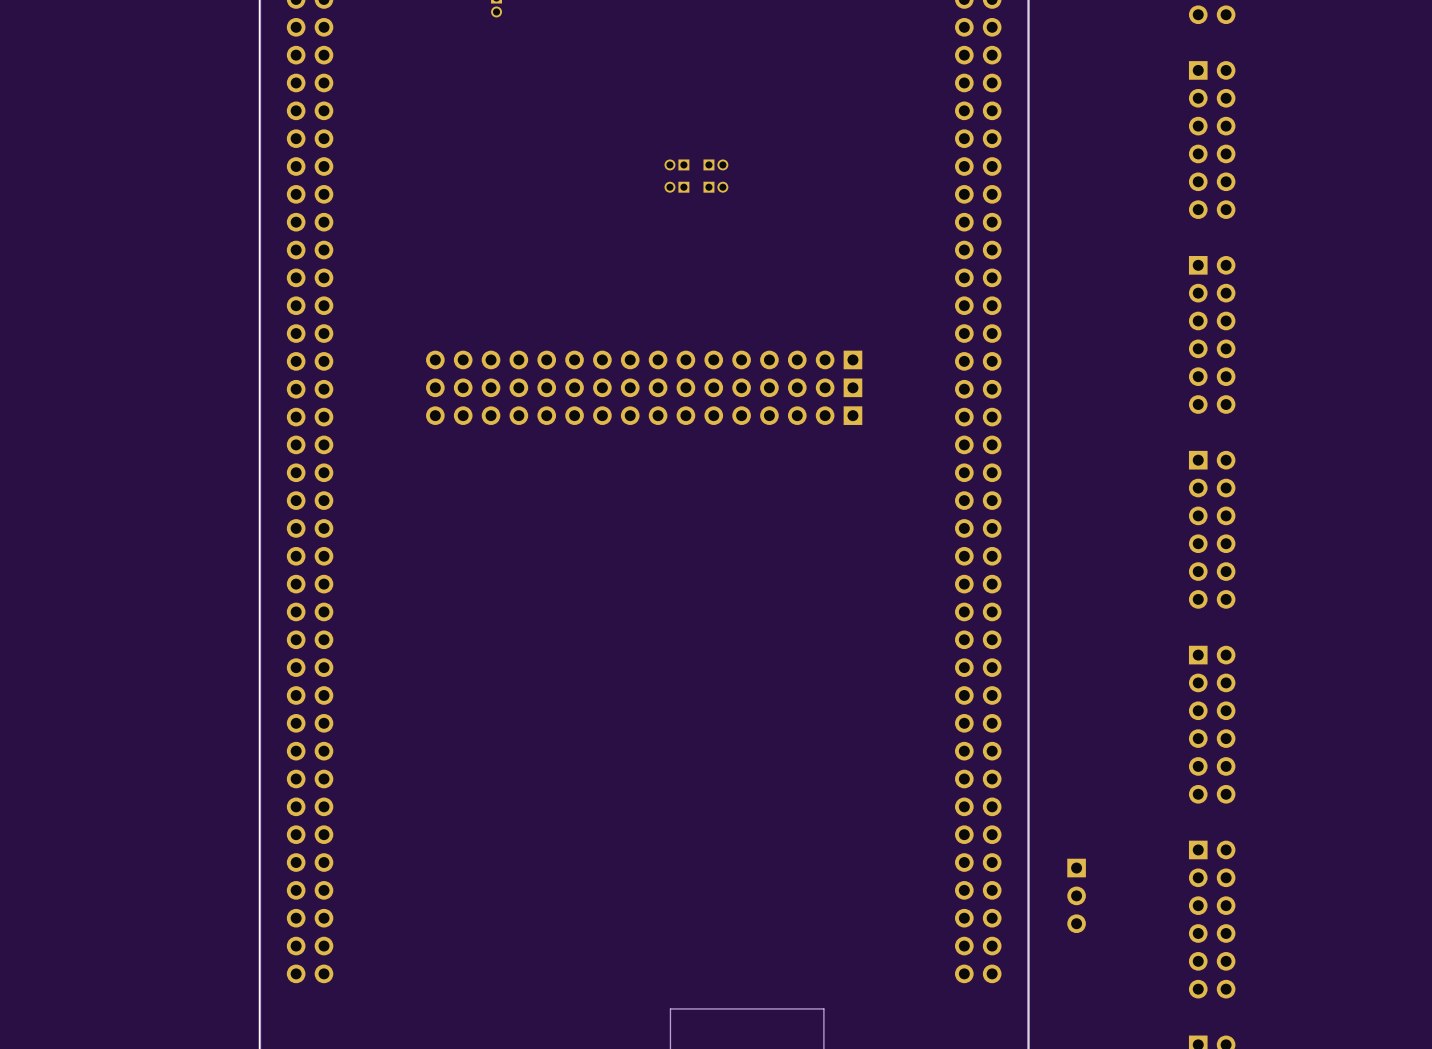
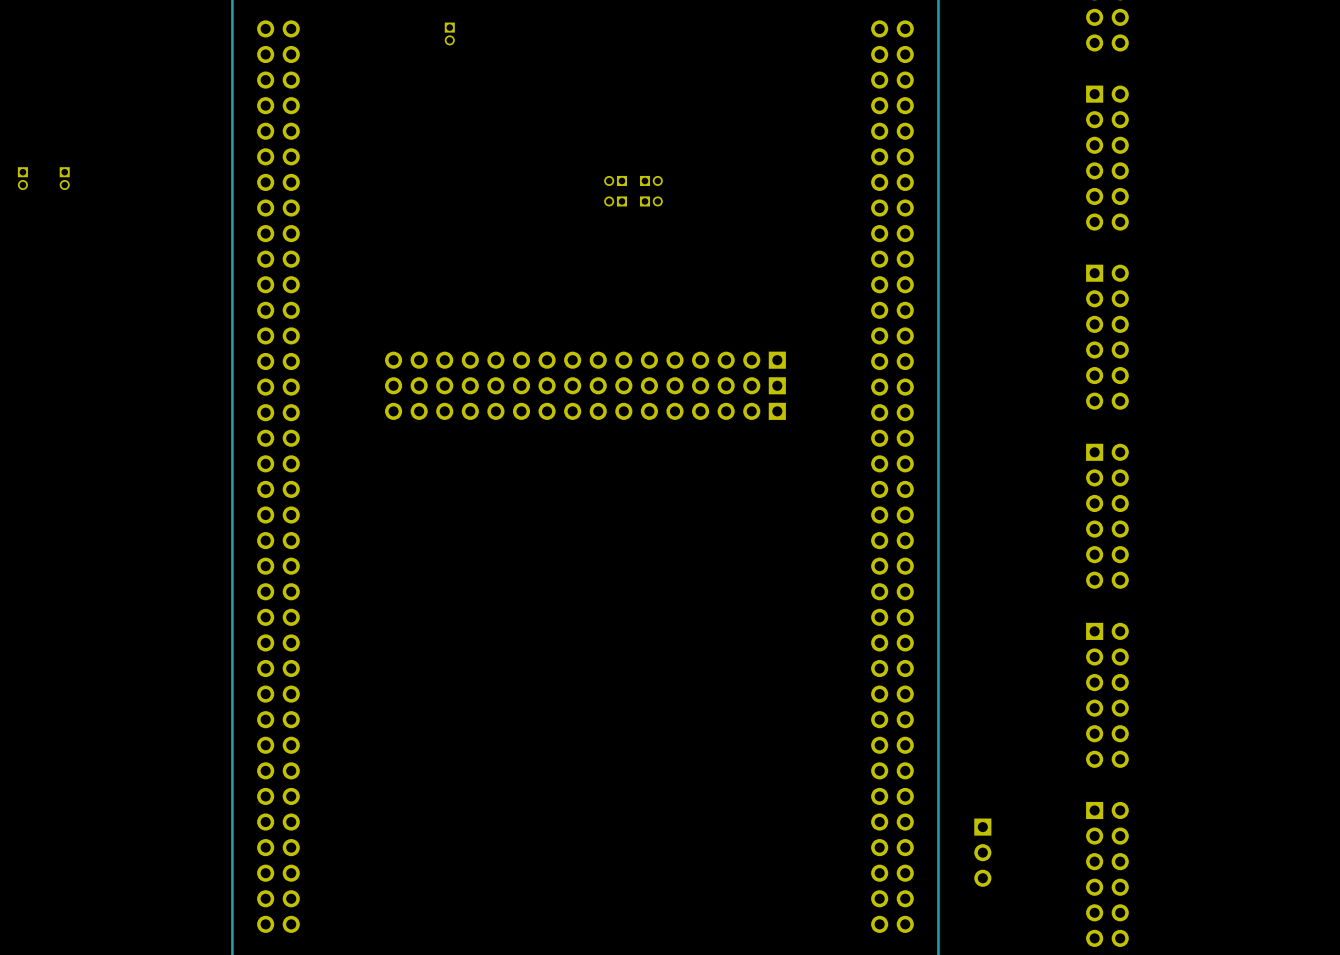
part: none -> (22, 178)
part: none -> (64, 178)

